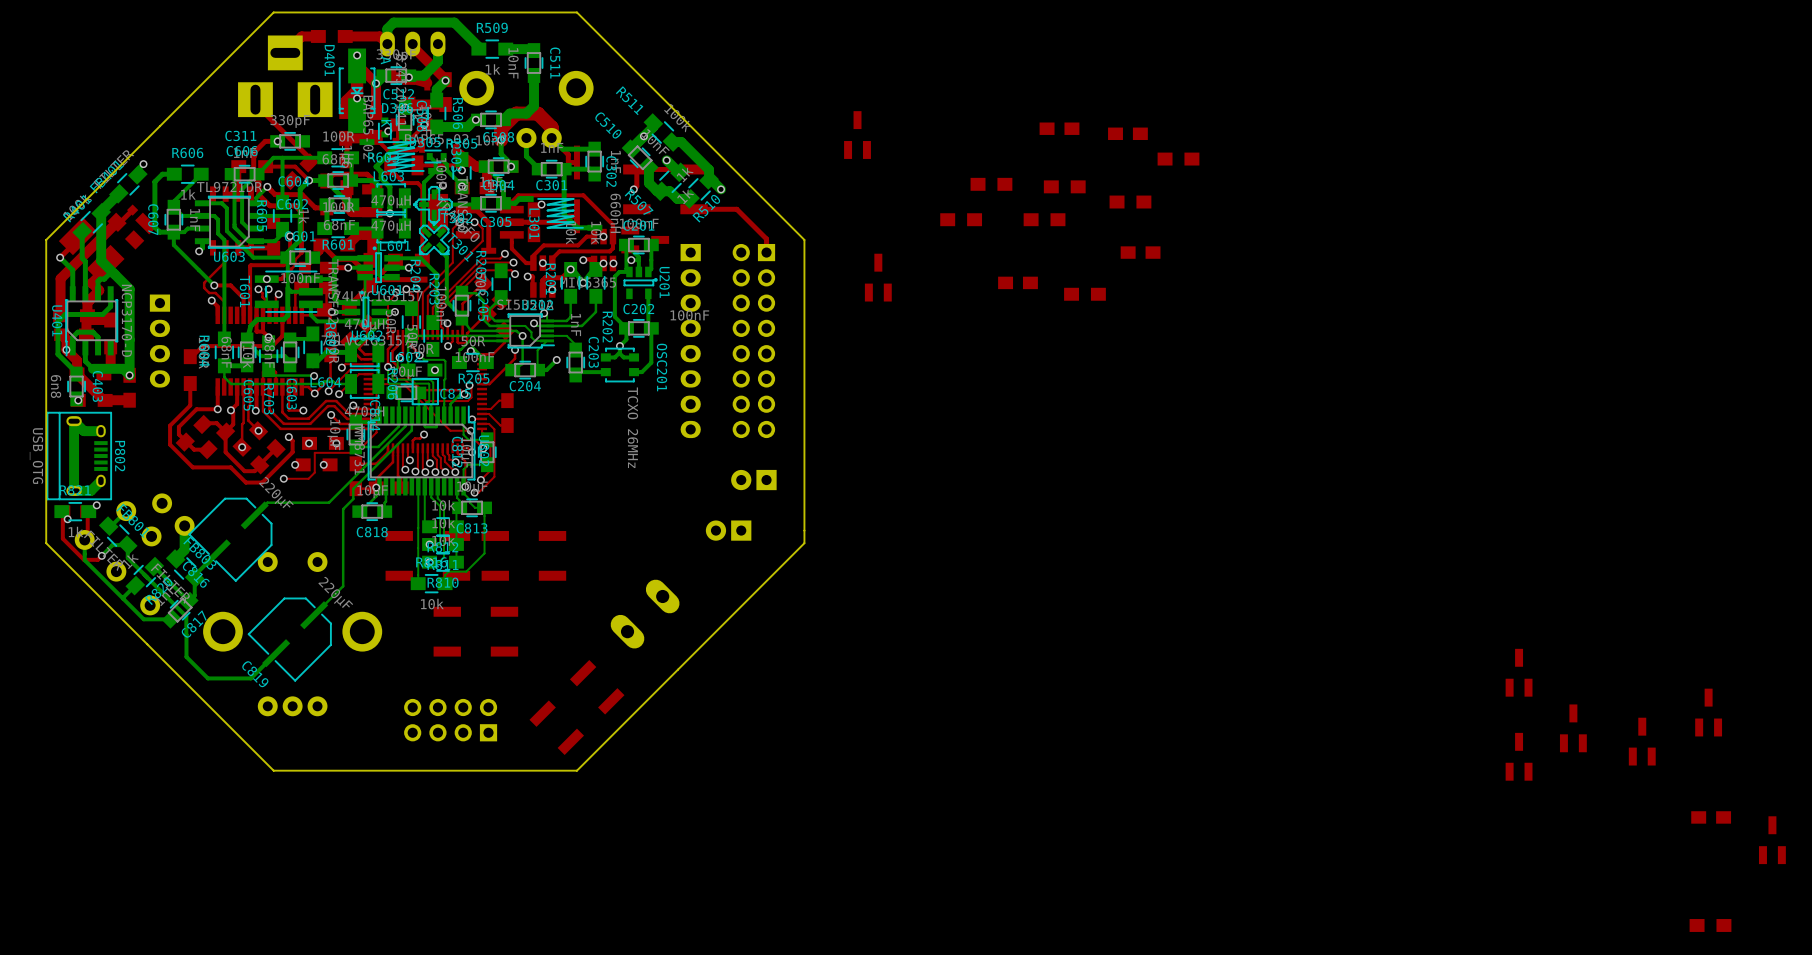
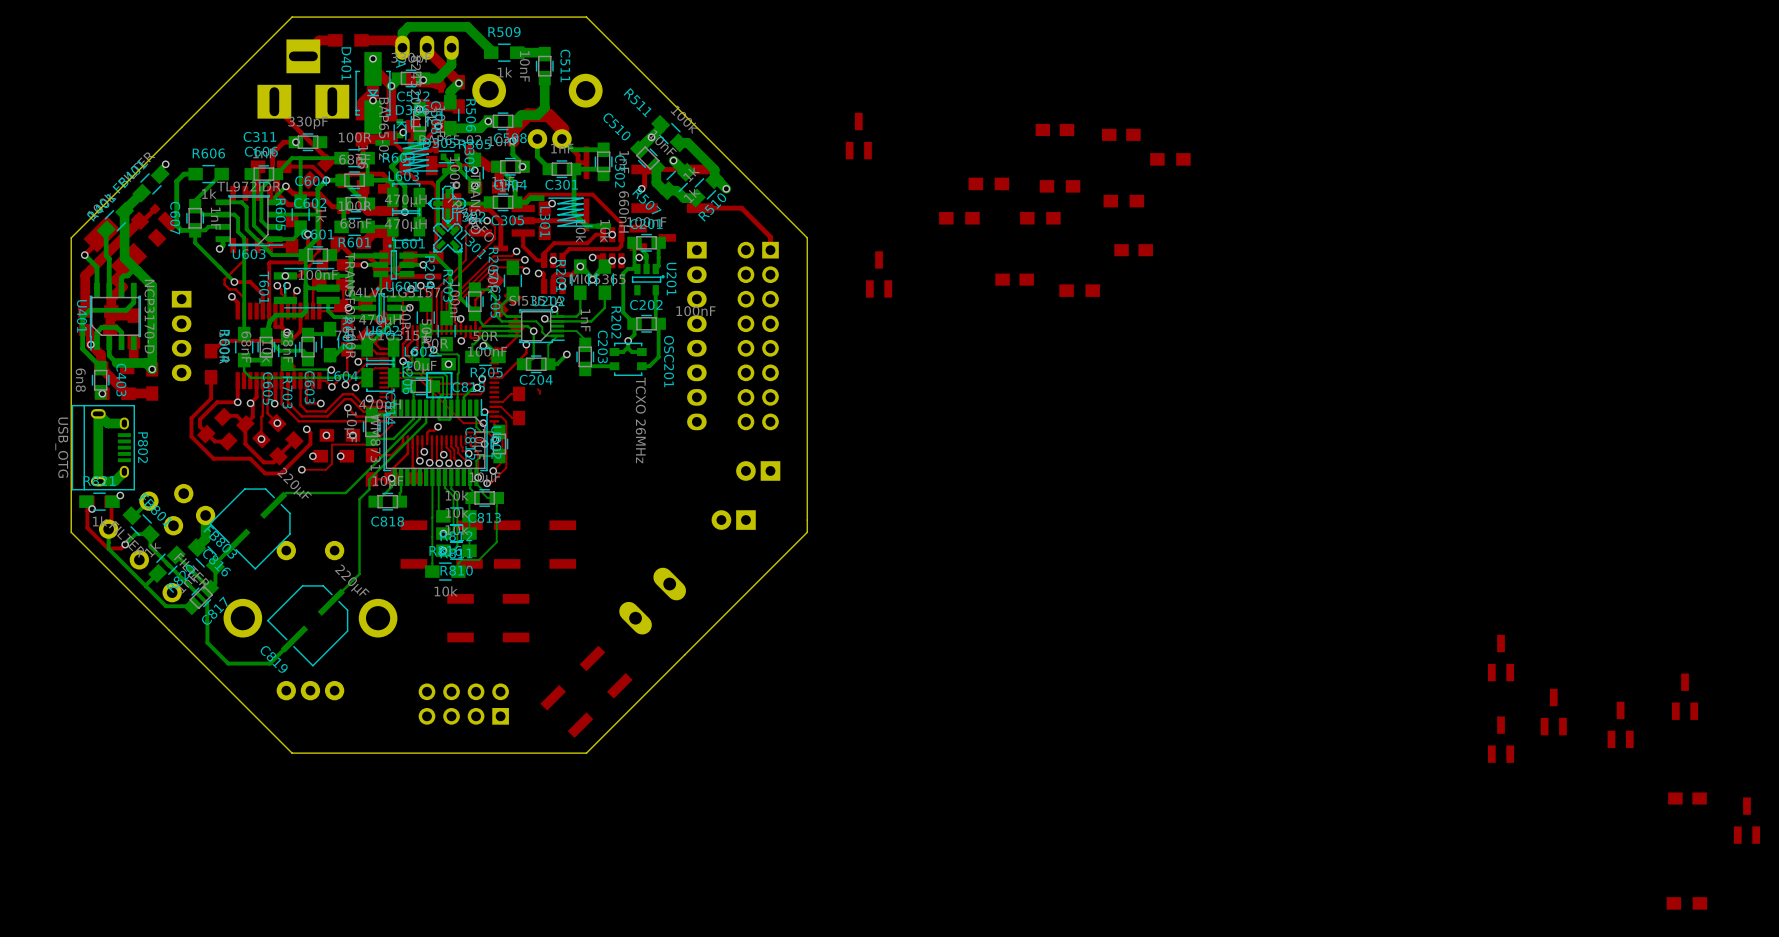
top track: none -> (537, 389) (539, 393)

